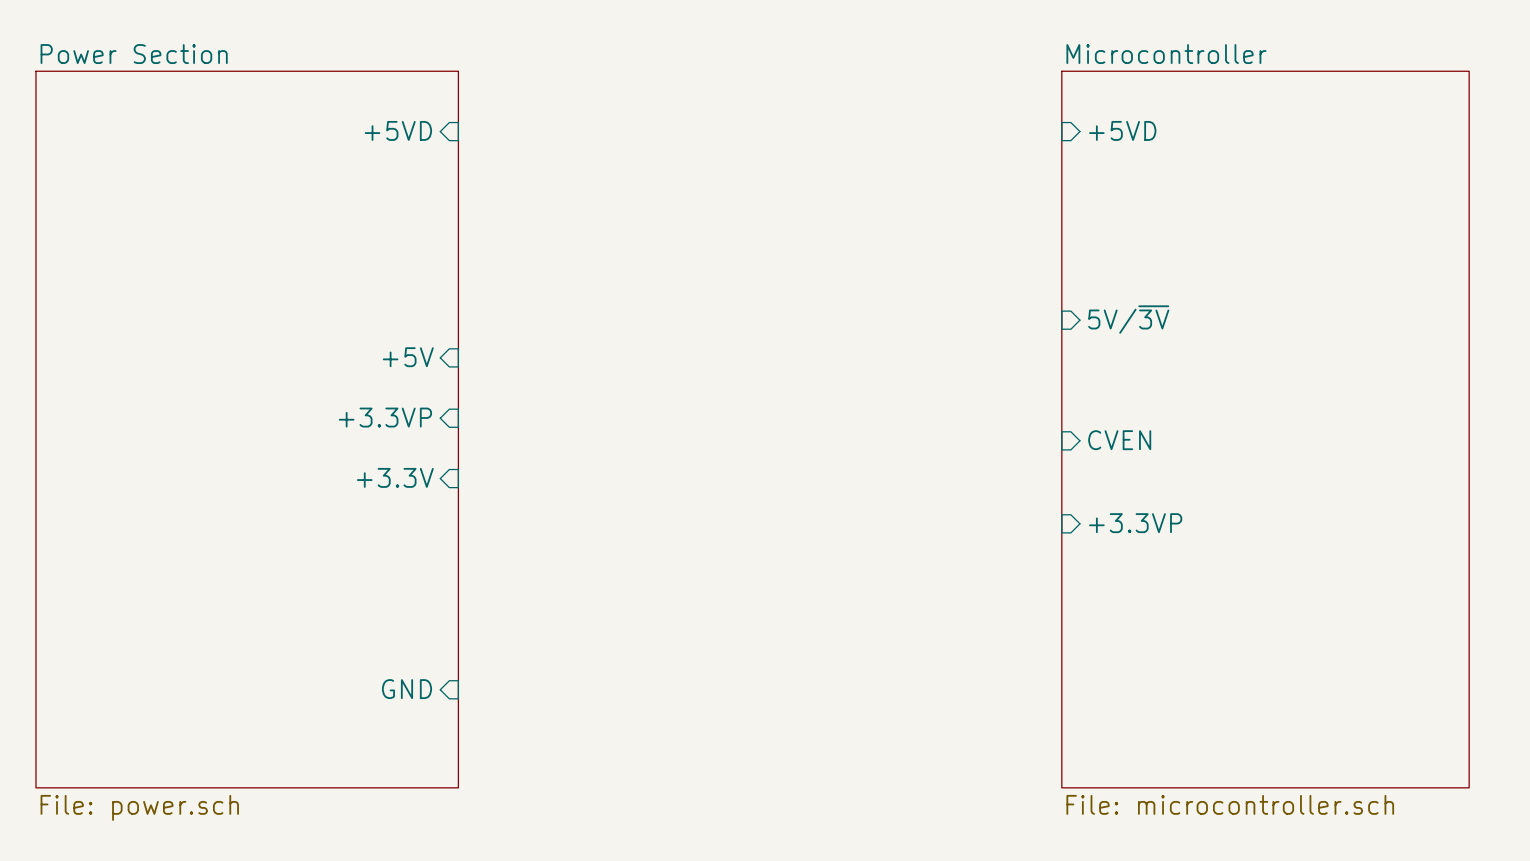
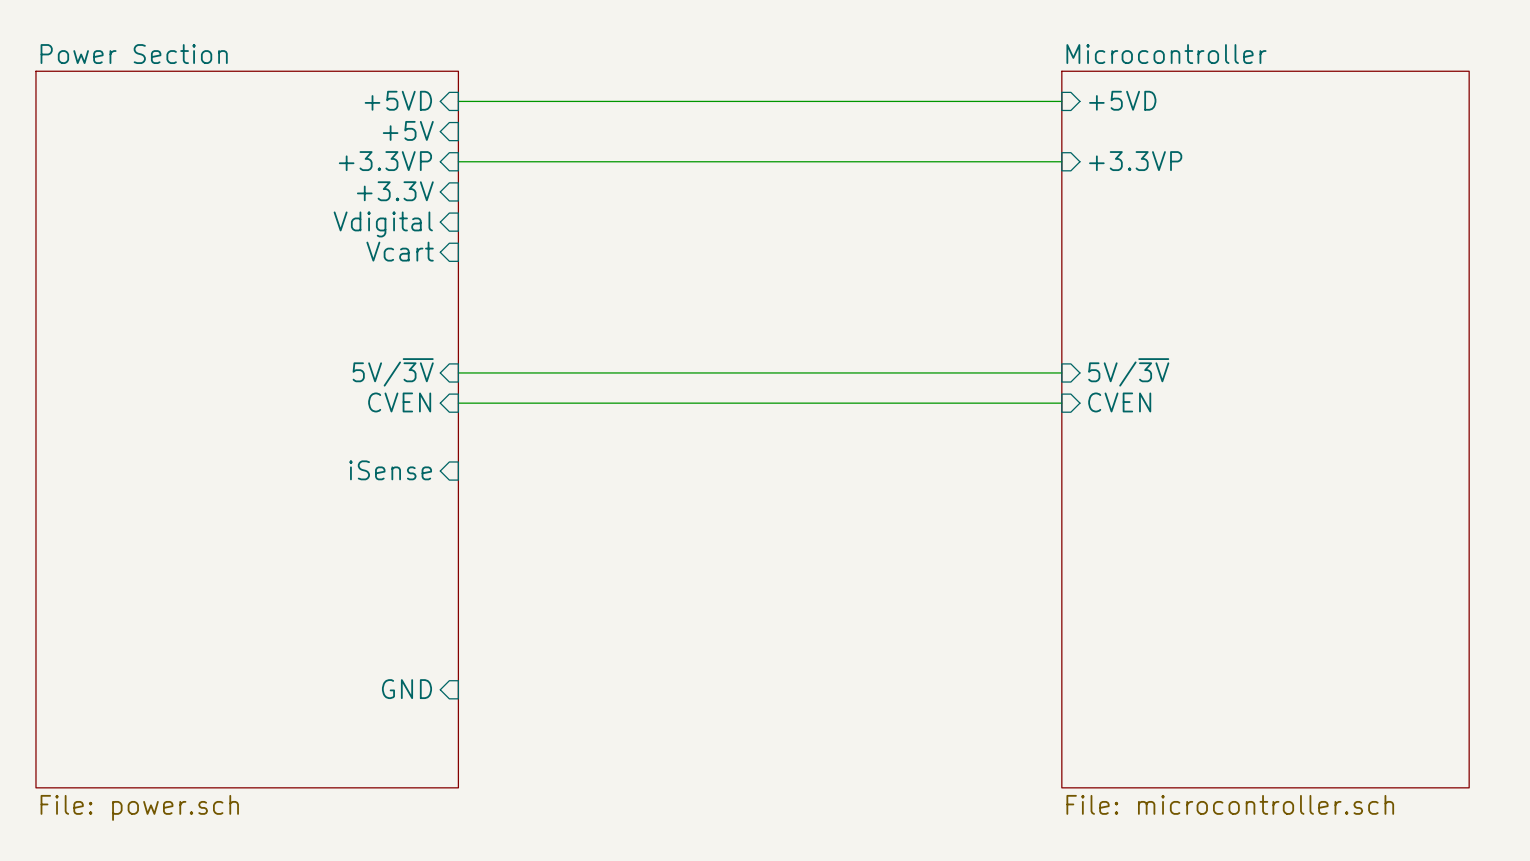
sheet pin: none -> +5VD (398, 100)
wire: none -> (458, 101) (1061, 101)
sheet pin: +5VD (398, 130) -> +5V (408, 130)
sheet pin position: +5VD (1122, 130) -> +5VD (1122, 100)
wire: none -> (458, 161) (1061, 161)
sheet pin: none -> +3.3VP (1135, 161)
sheet pin: none -> Vdigital (383, 224)
sheet pin: none -> Vcart (400, 251)
sheet pin position: 5V/~{3V} (1128, 319) -> 5V/~{3V} (1128, 372)
sheet pin: +5V (408, 357) -> none
sheet pin: none -> 5V/~{3V} (393, 372)
wire: none -> (458, 372) (1061, 372)
sheet pin: none -> CVEN (399, 402)
wire: none -> (458, 403) (1061, 403)
sheet pin position: +3.3VP (385, 417) -> +3.3VP (385, 161)
sheet pin position: CVEN (1119, 440) -> CVEN (1119, 402)
sheet pin: none -> iSense (390, 470)
sheet pin position: +3.3V (395, 477) -> +3.3V (395, 191)
sheet pin: +3.3VP (1135, 523) -> none

